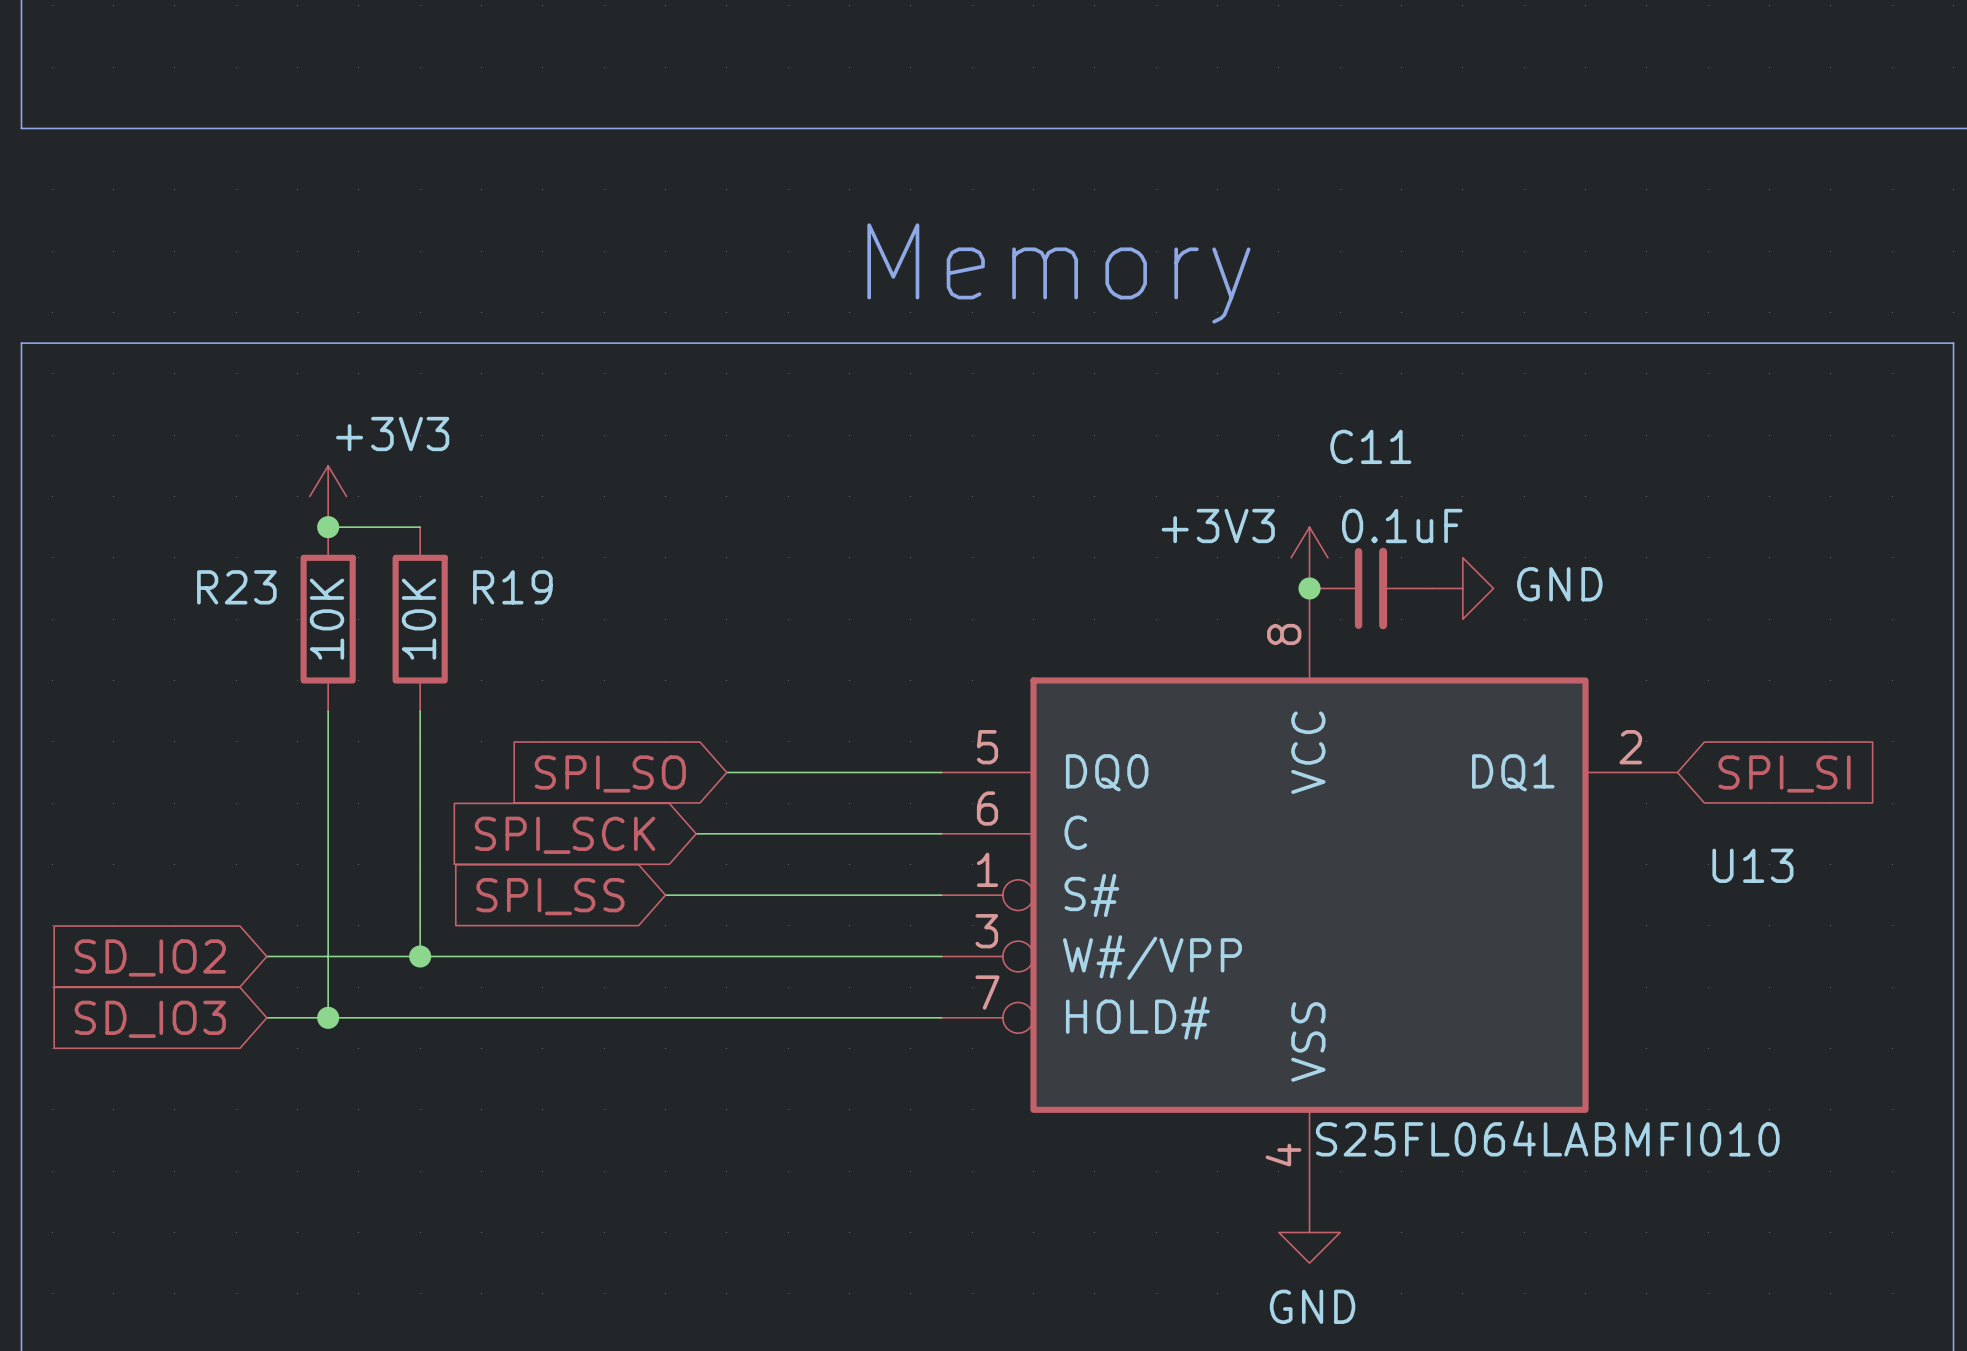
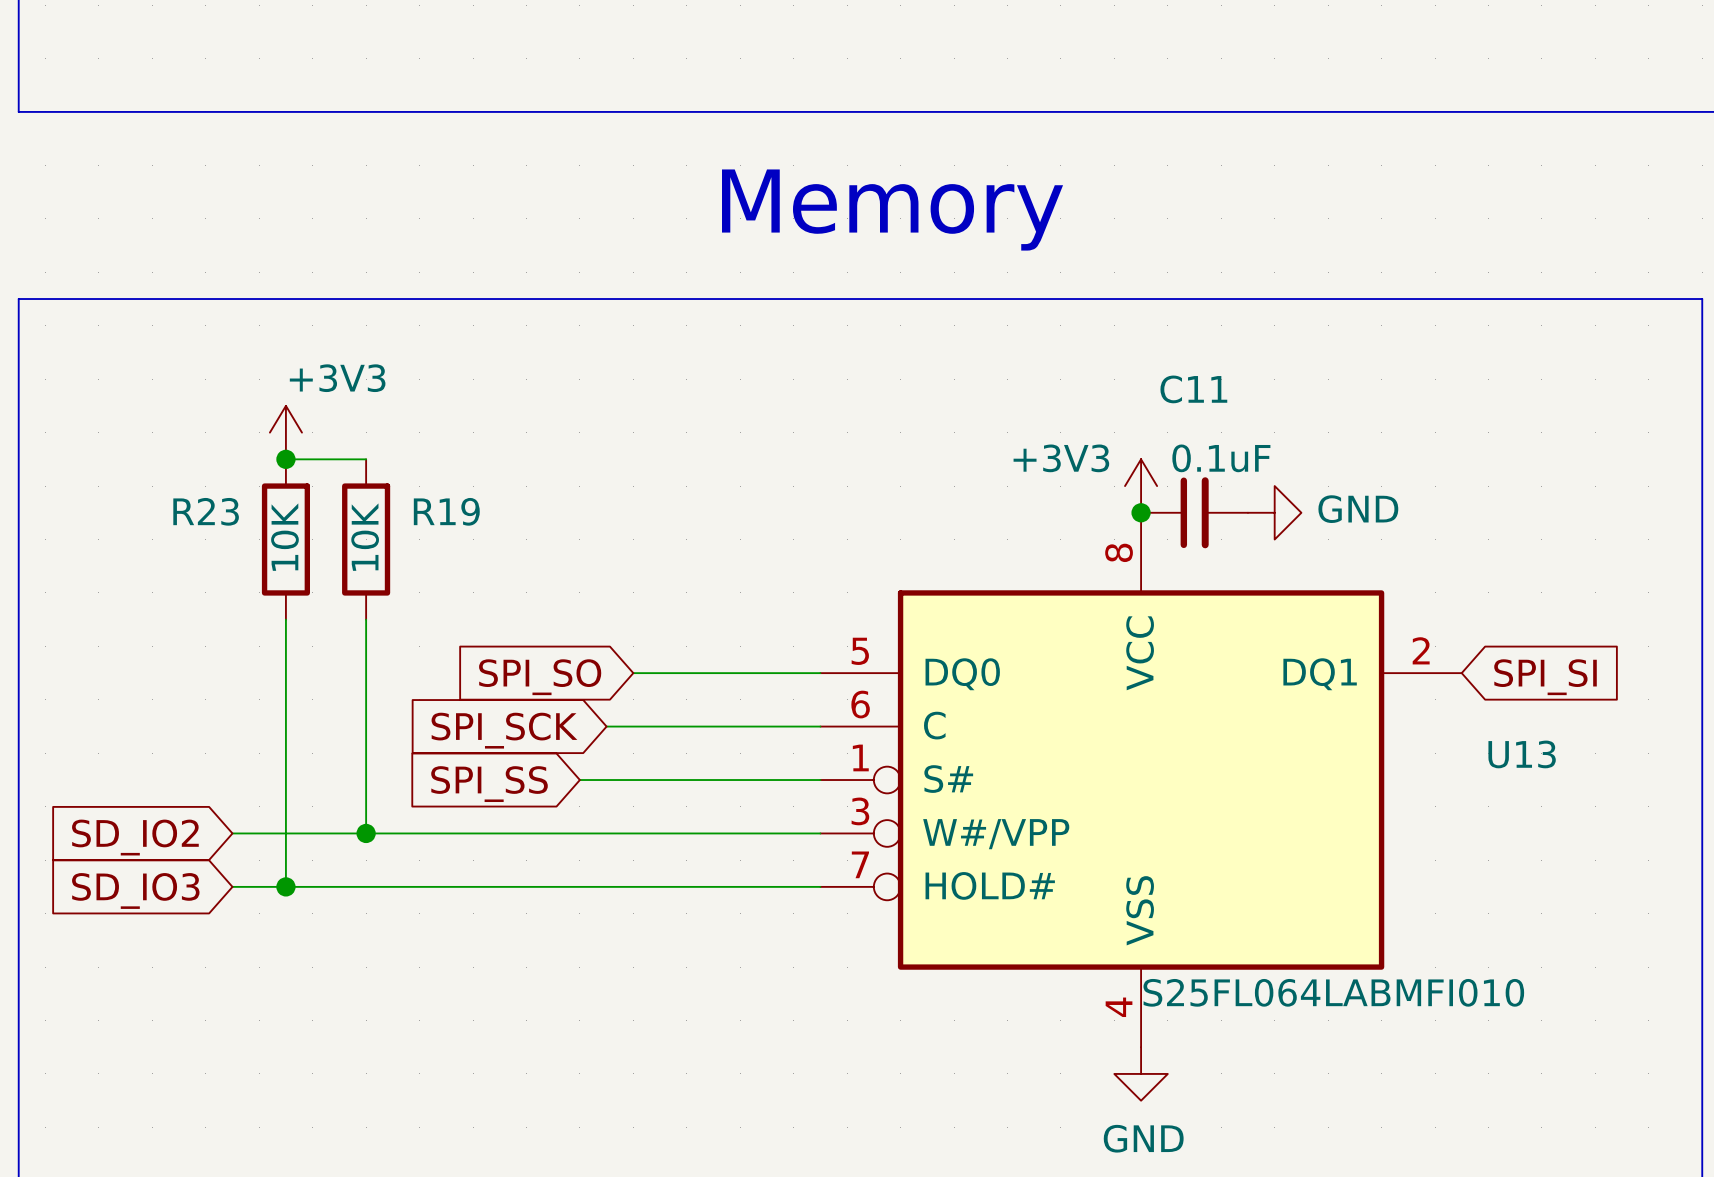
text position: Memory (1058, 273) -> Memory (892, 210)

